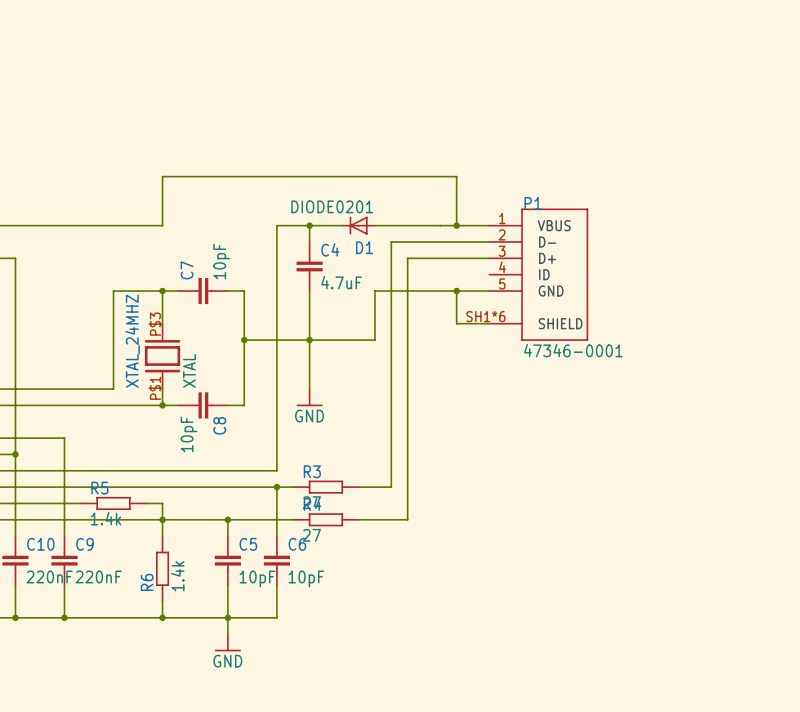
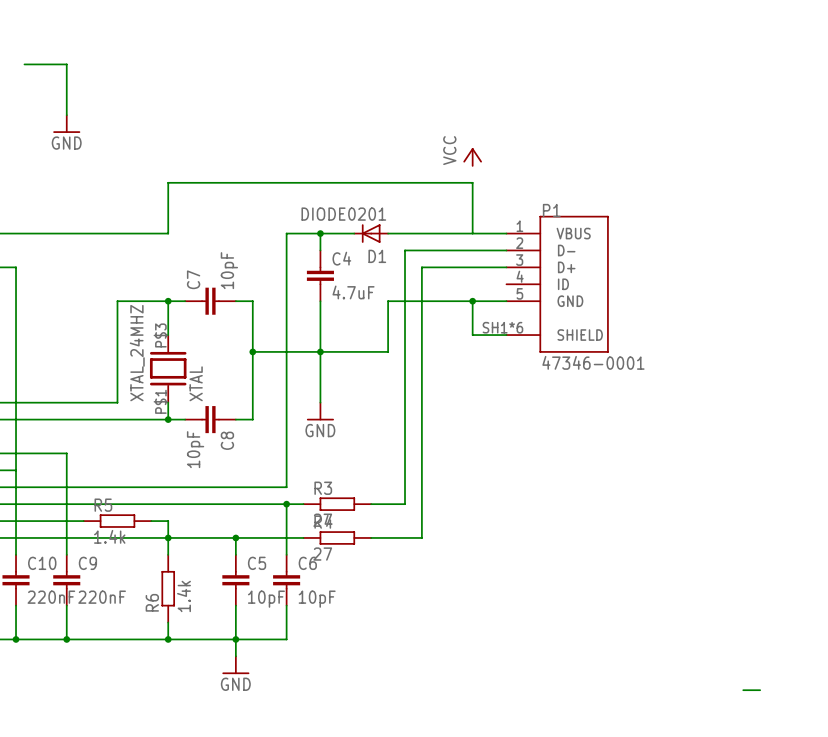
wire: none -> (24, 64) (66, 64) (66, 115)
power symbol: none -> GND (66, 124)
power symbol: none -> VCC (472, 157)
junction: (456, 225) -> none
junction: (15, 454) -> none
wire: none -> (743, 690) (760, 690)

